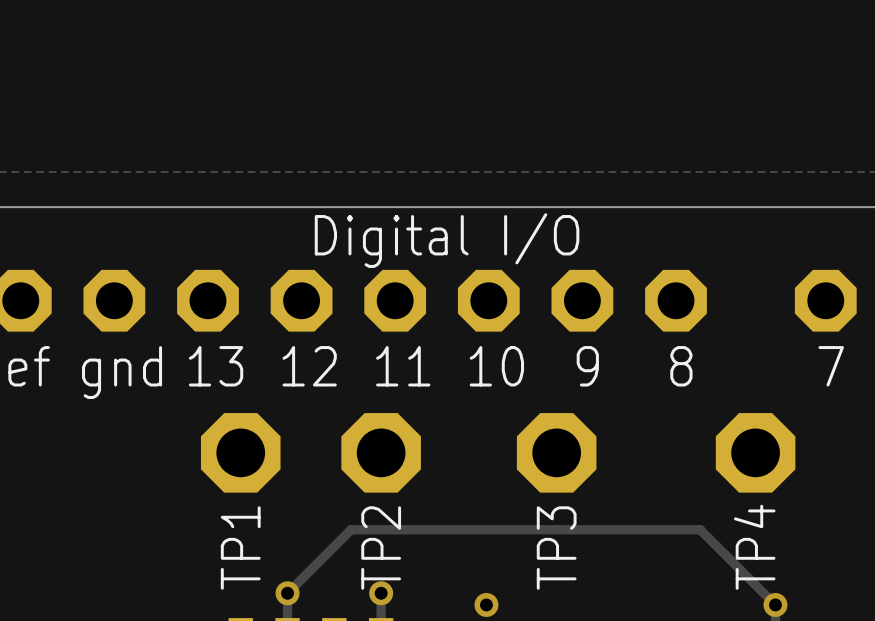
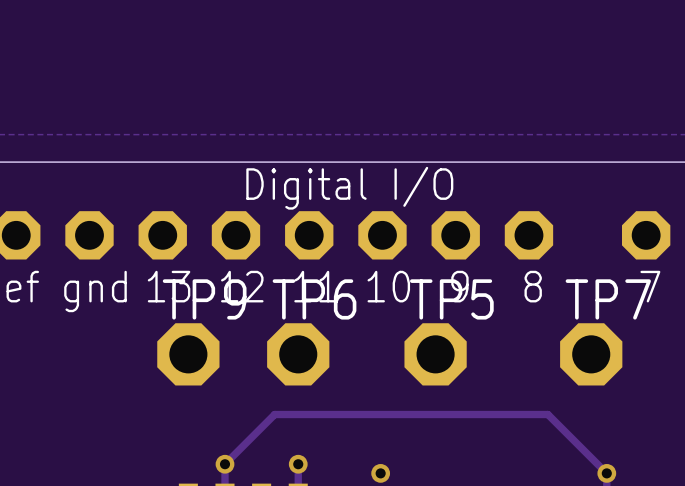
TP4 name: TP4 (754, 547) -> TP7 (608, 299)
TP1 name: TP1 (240, 548) -> TP9 (204, 299)
TP2 name: TP2 (381, 548) -> TP6 (314, 299)
TP3 name: TP3 (556, 548) -> TP5 (451, 299)

